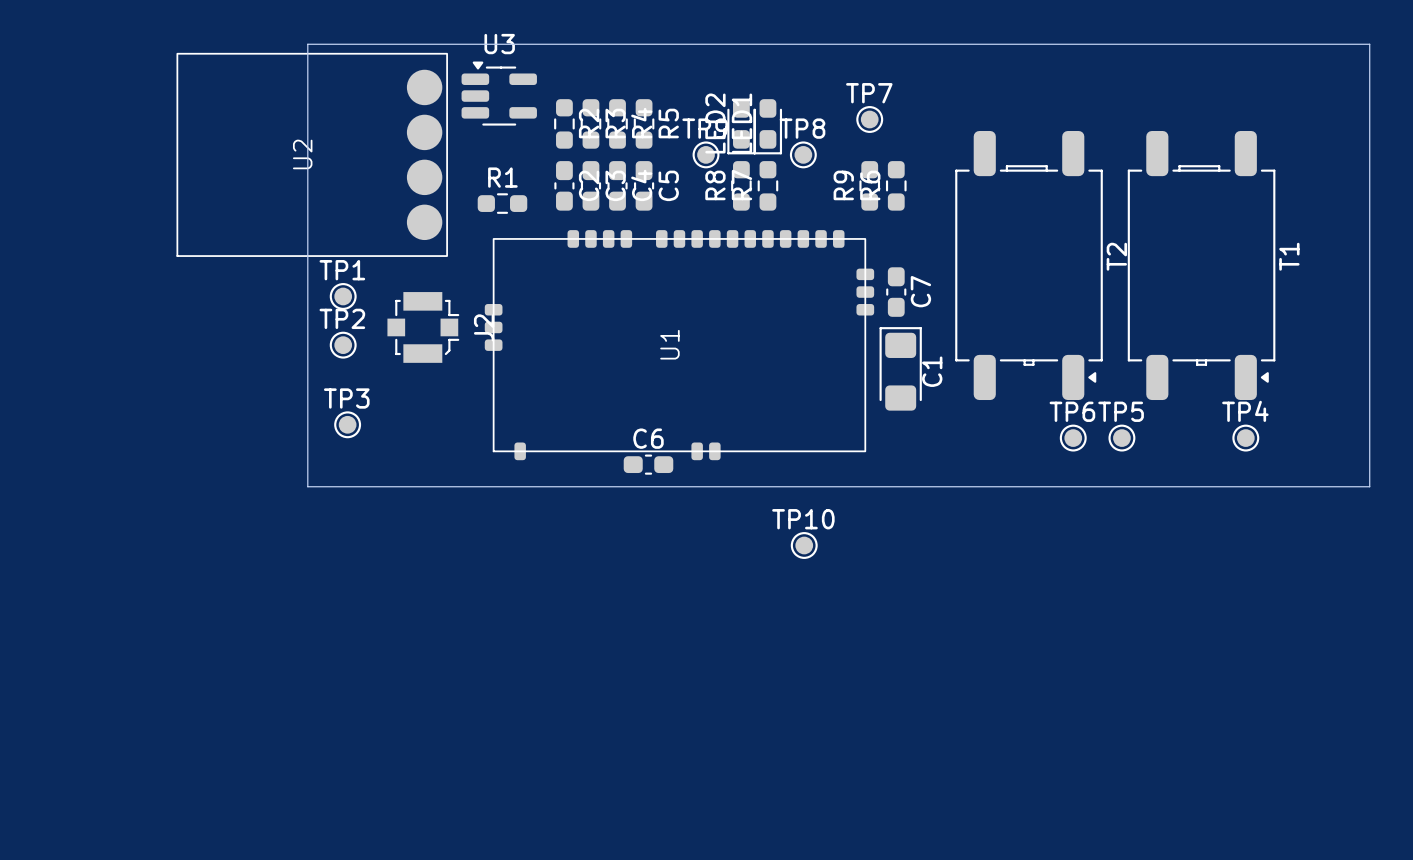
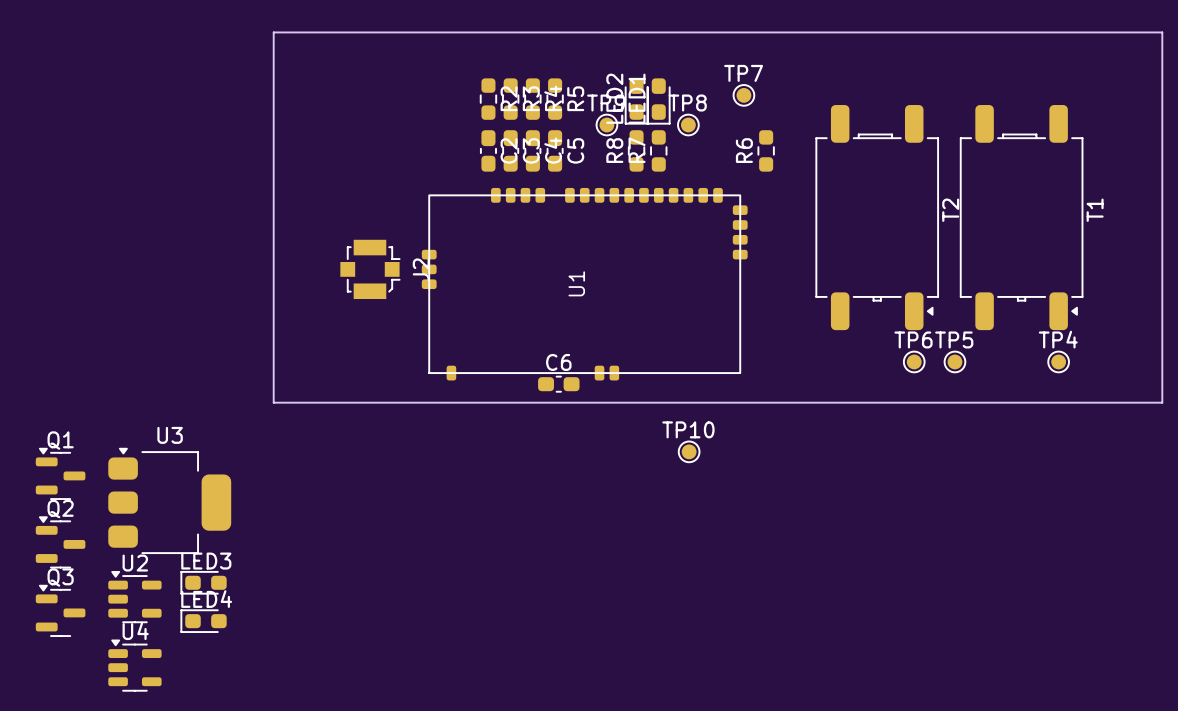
U2 footprint: [176, 52, 448, 257] -> [108, 571, 162, 624]
U3 footprint: [461, 61, 537, 126] -> [108, 447, 232, 554]
U2 name position: U2 (302, 154) -> U2 (135, 563)
R9: (869, 185) -> none
R1: (502, 203) -> none
U1 footprint: [484, 230, 875, 461] -> [421, 187, 748, 381]
C7: (896, 292) -> none
TP1: (343, 296) -> none
TP2: (343, 345) -> none
C1: (900, 368) -> none
TP3: (347, 424) -> none
Q1: none -> (60, 473)
Q2: none -> (60, 542)
LED3: none -> (203, 582)
Q3: none -> (60, 610)
LED4: none -> (203, 621)
U4: none -> (134, 665)

